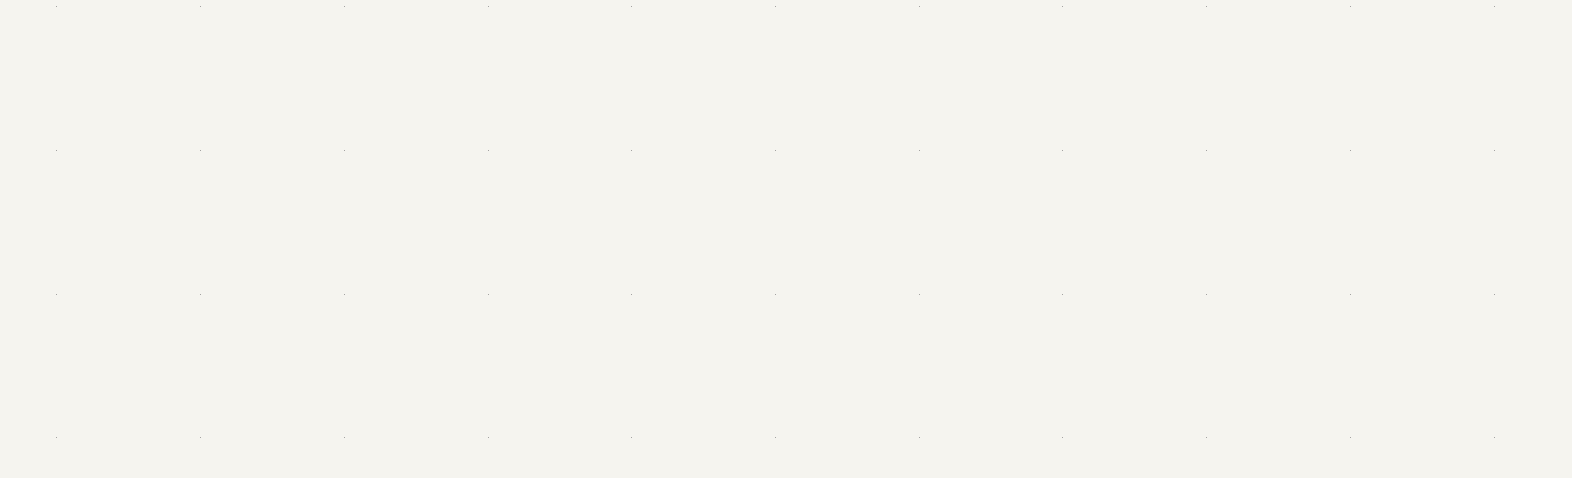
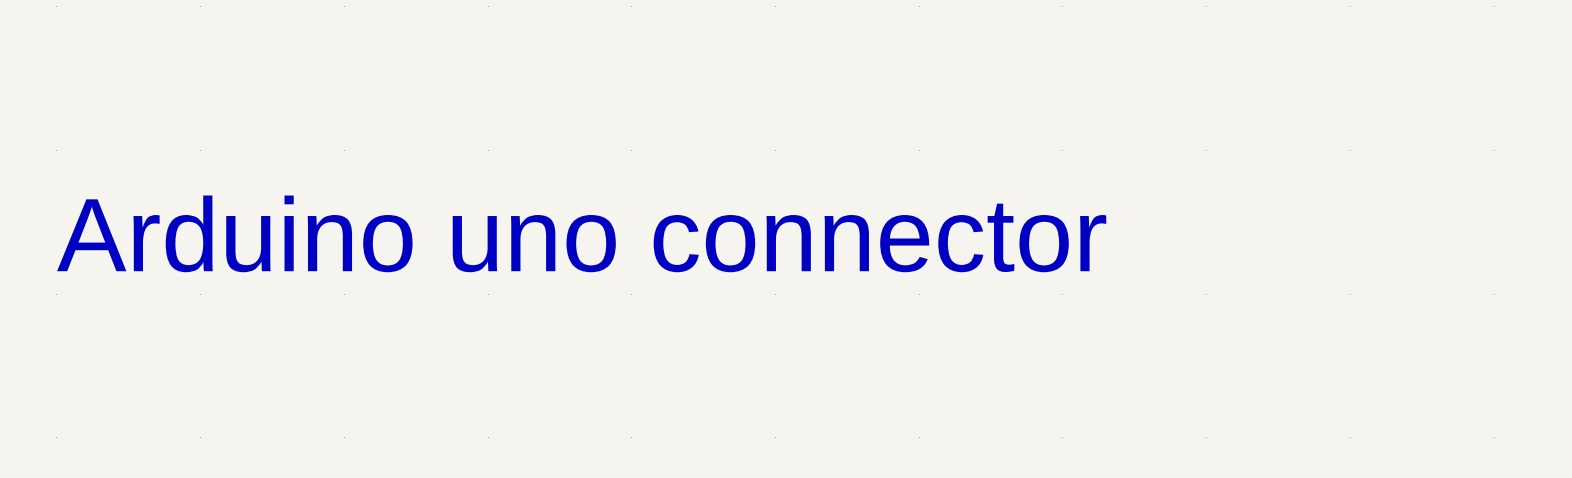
text: none -> Arduino uno connector (581, 233)

